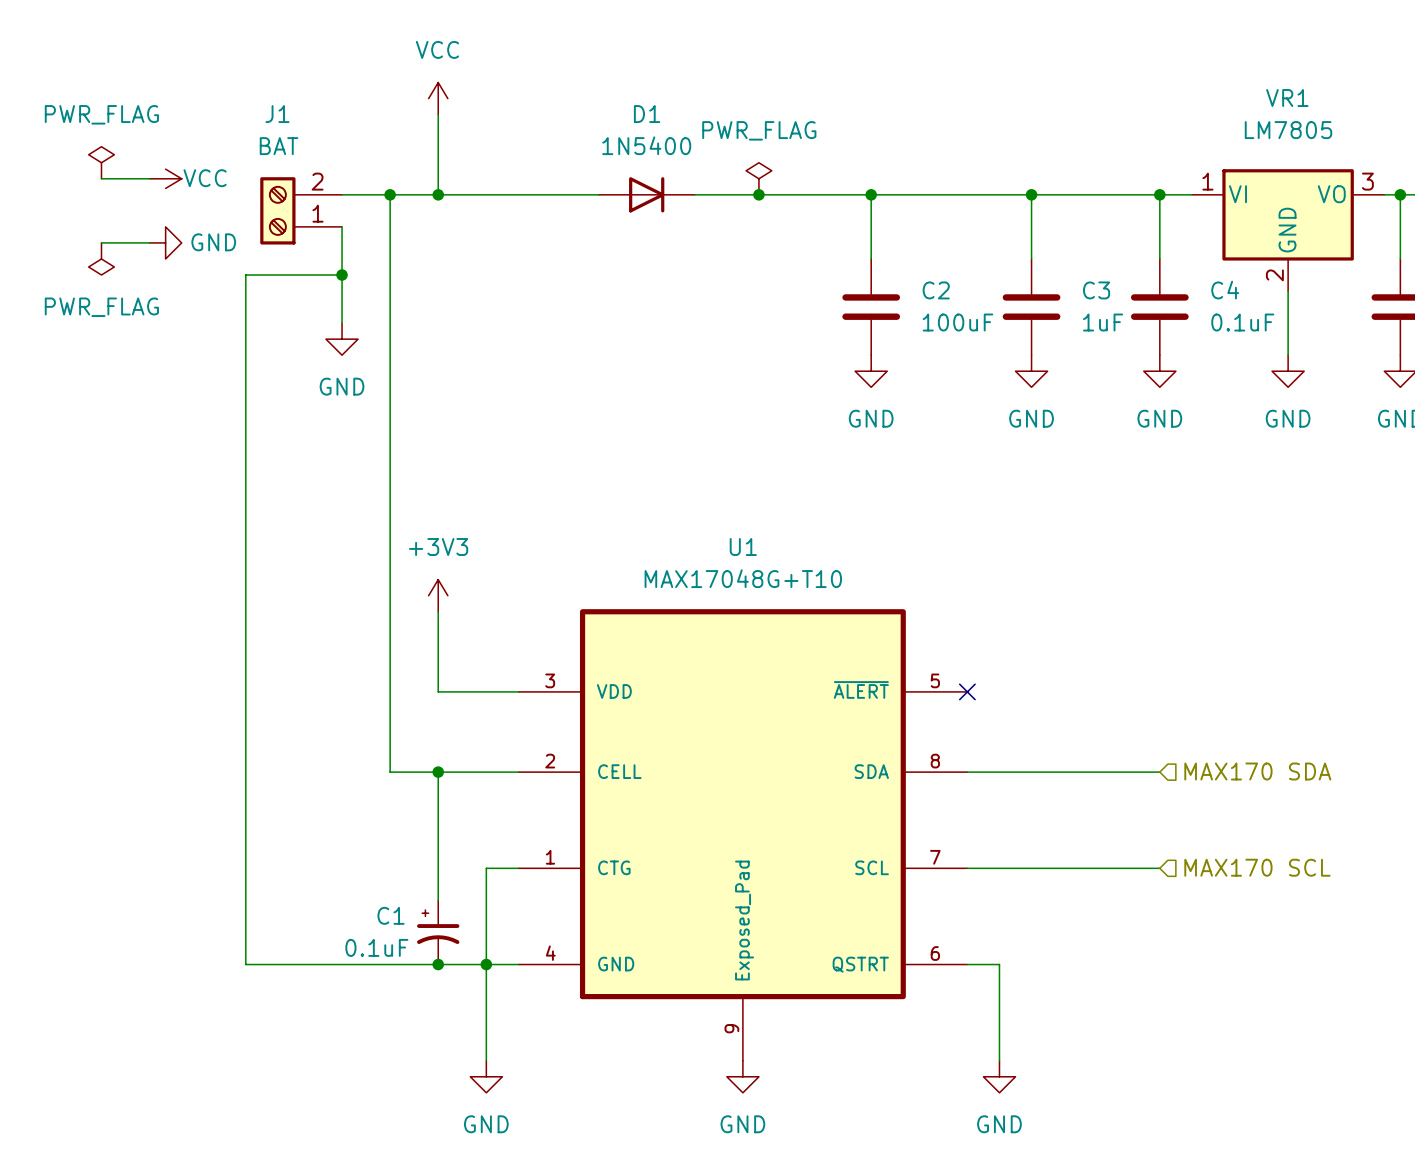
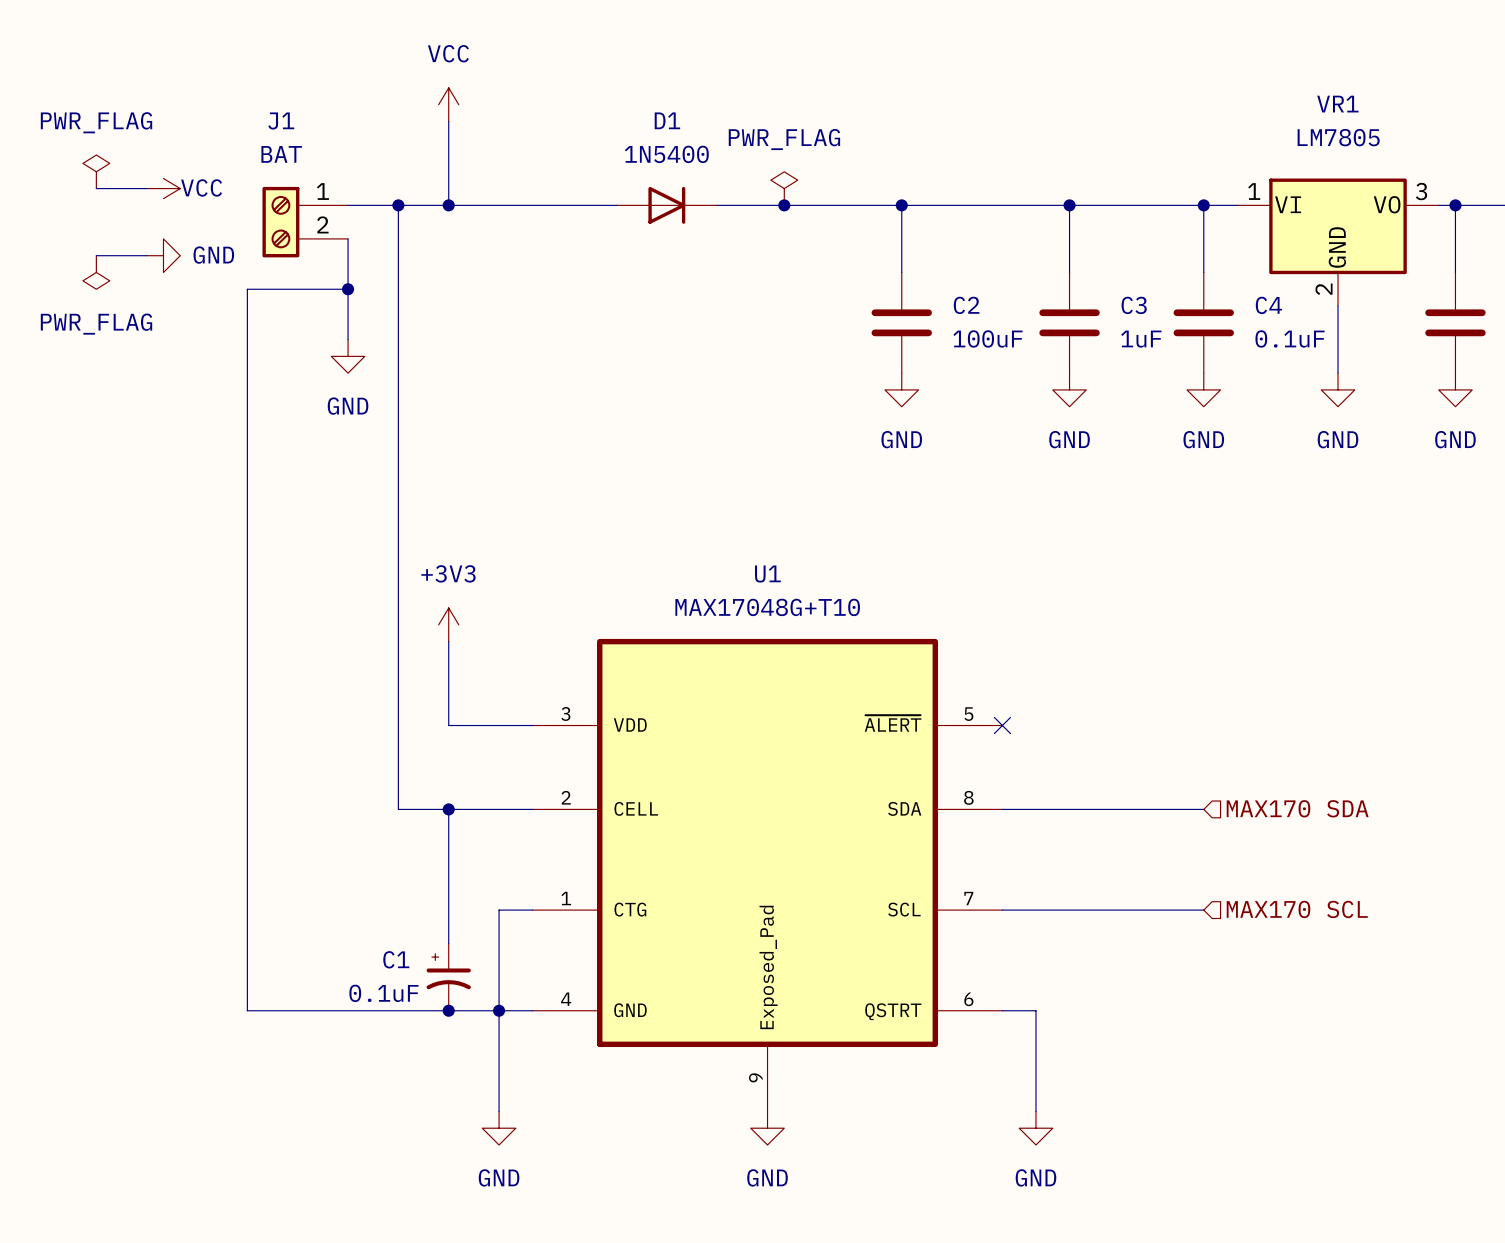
J1 flip: as is (277, 210) -> up-down (280, 222)

